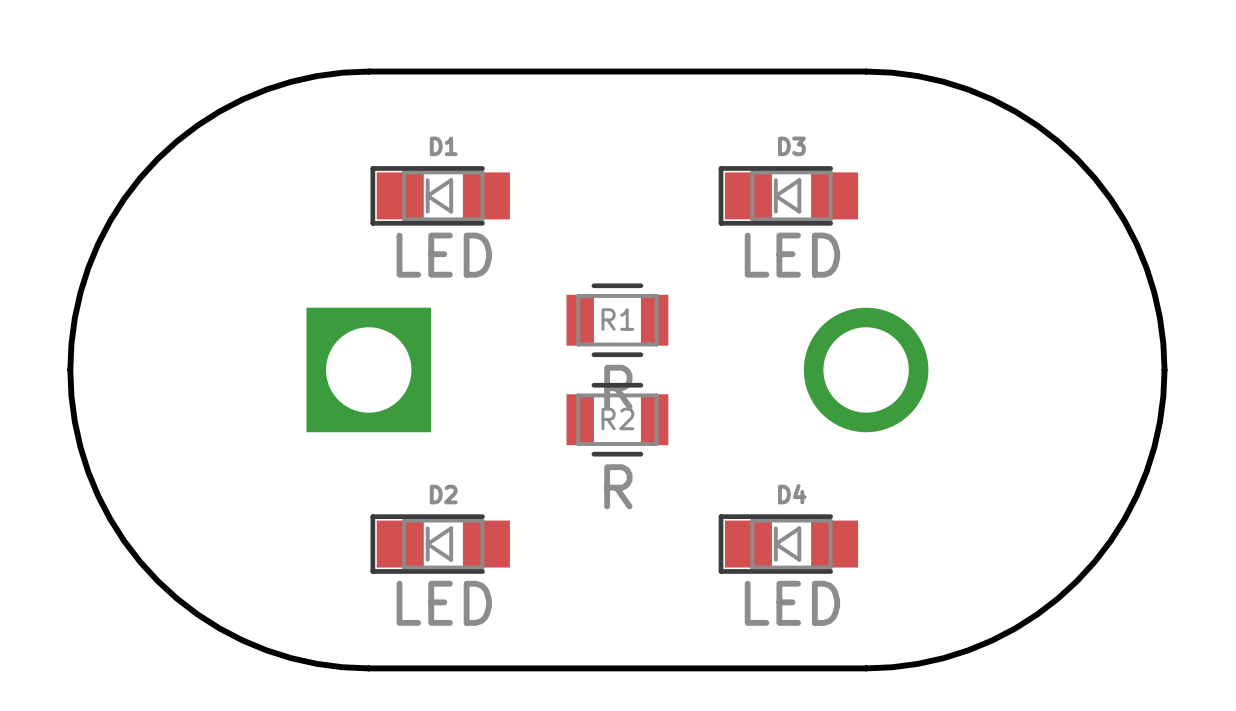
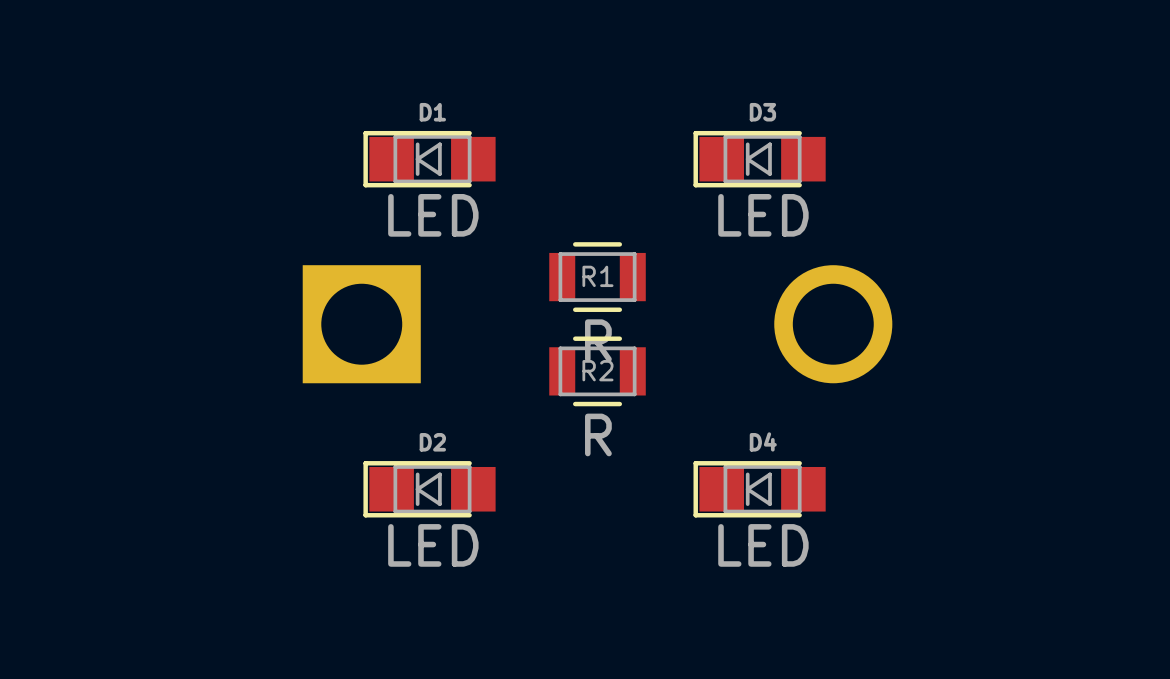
board edge: (368, 71) (892, 72) (943, 81) (992, 99) (1015, 111) (1057, 141) (1077, 158) (1110, 198) (1136, 243) (1154, 292) (1160, 318) (1164, 369) (1160, 421) (1146, 472) (1124, 519) (1110, 541) (1077, 580) (1057, 598) (1015, 628) (992, 640) (943, 658) (892, 667) (342, 667) (291, 658) (242, 640) (219, 628) (176, 598) (140, 561) (110, 519) (88, 472) (74, 421) (70, 369) (74, 318) (80, 292) (98, 243) (124, 198) (157, 158) (176, 141) (219, 111) (266, 89) (316, 76) (368, 71) -> none

